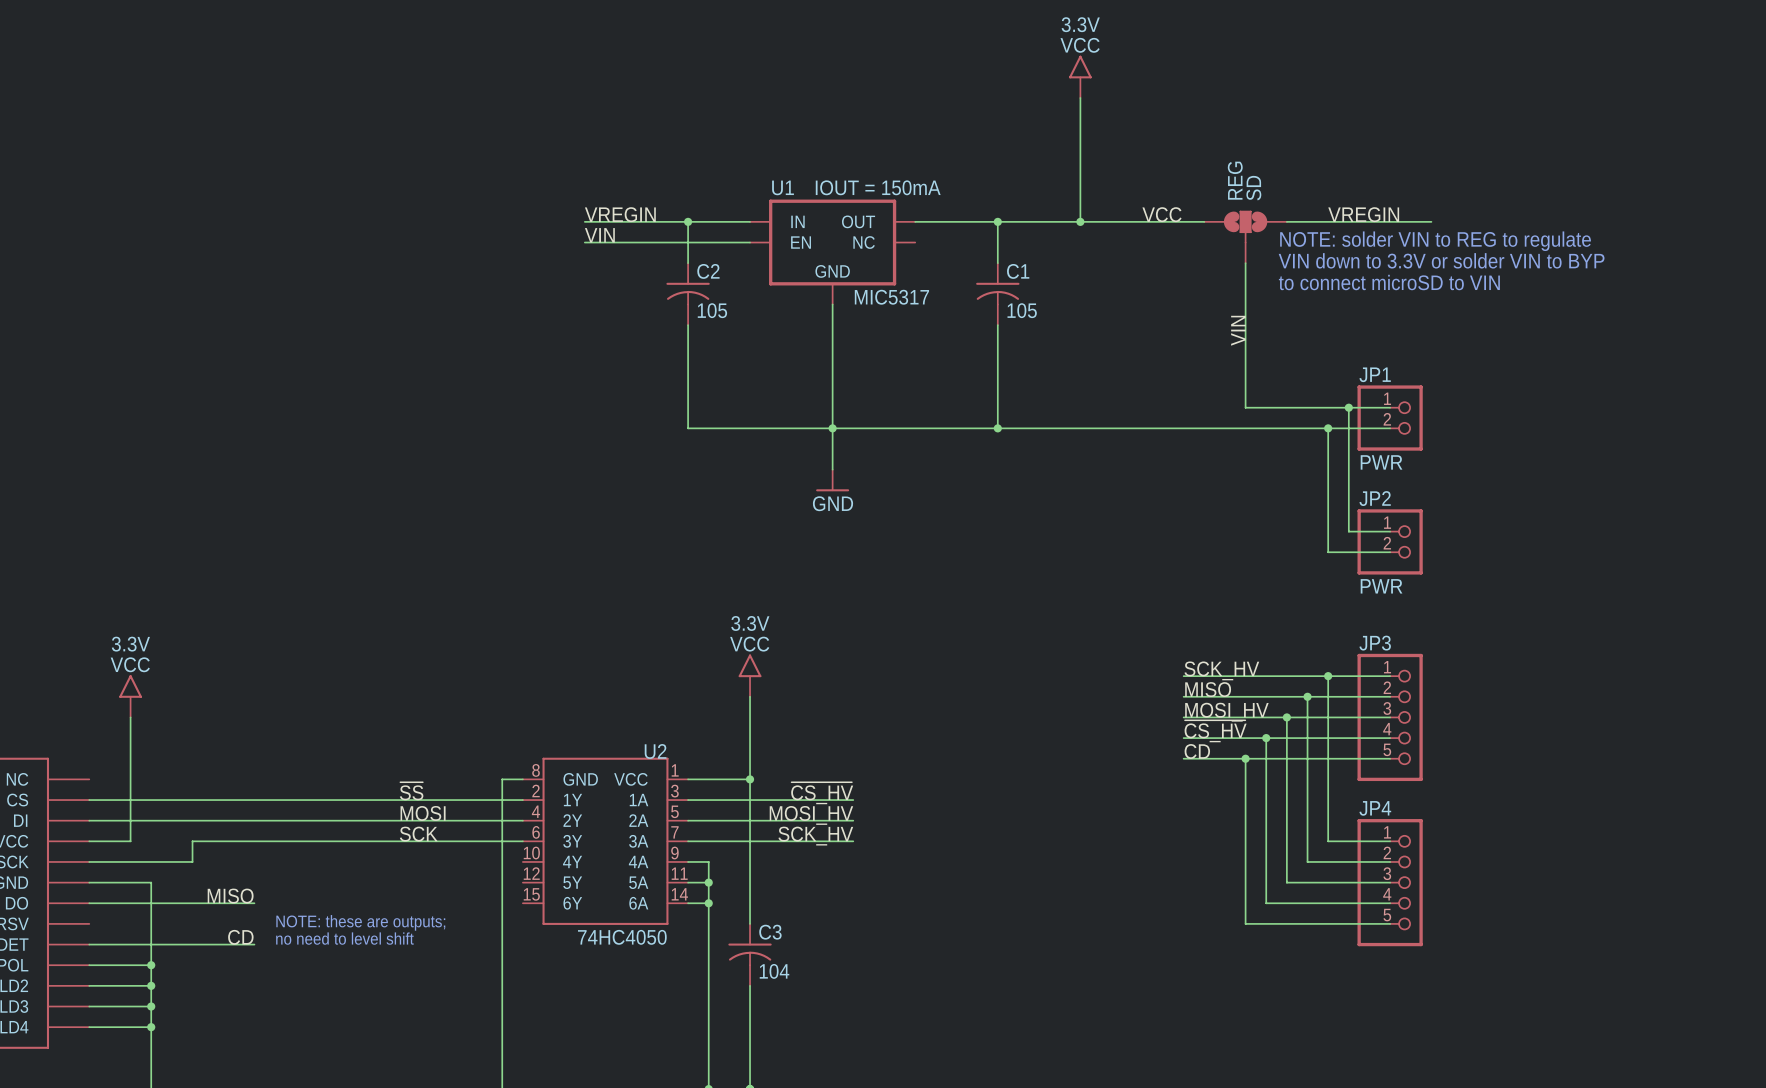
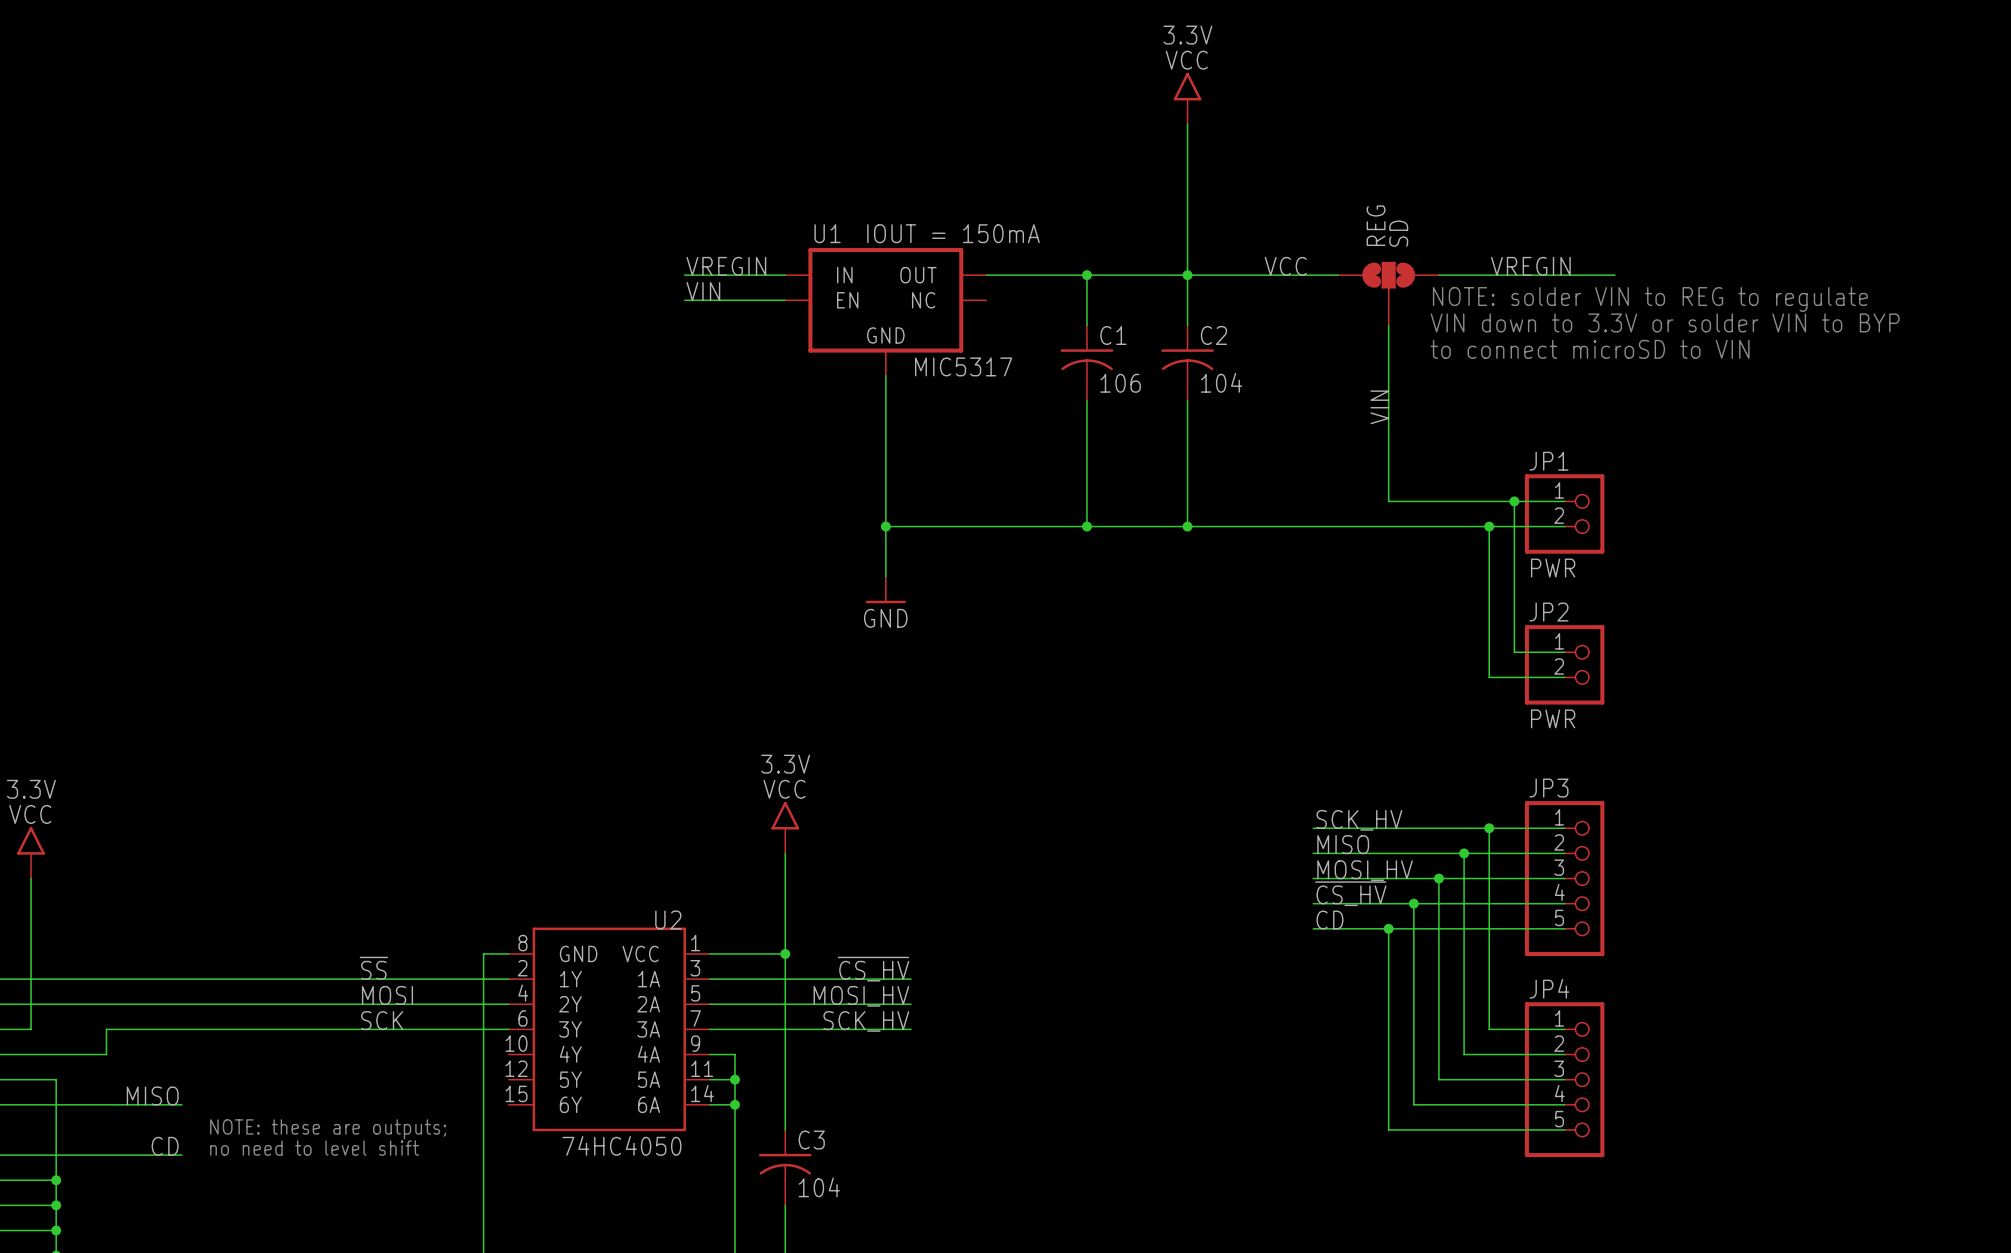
label position: VREGIN (620, 214) -> VREGIN (726, 266)
wire: (584, 221) (667, 221) -> none
wire: (688, 221) (688, 263) -> none
junction: (688, 221) -> none
wire: none -> (1187, 275) (1187, 325)
label position: VIN (599, 235) -> VIN (703, 291)
wire: (584, 242) (667, 242) -> none
C2 position: (688, 294) -> (1187, 363)
C2 value: 105 (712, 310) -> 104 (1221, 382)
C1 value: 105 (1022, 310) -> 106 (1120, 383)
wire: (688, 325) (688, 428) (832, 428) -> none
wire: none -> (1187, 400) (1187, 526)
junction: none -> (1187, 526)

